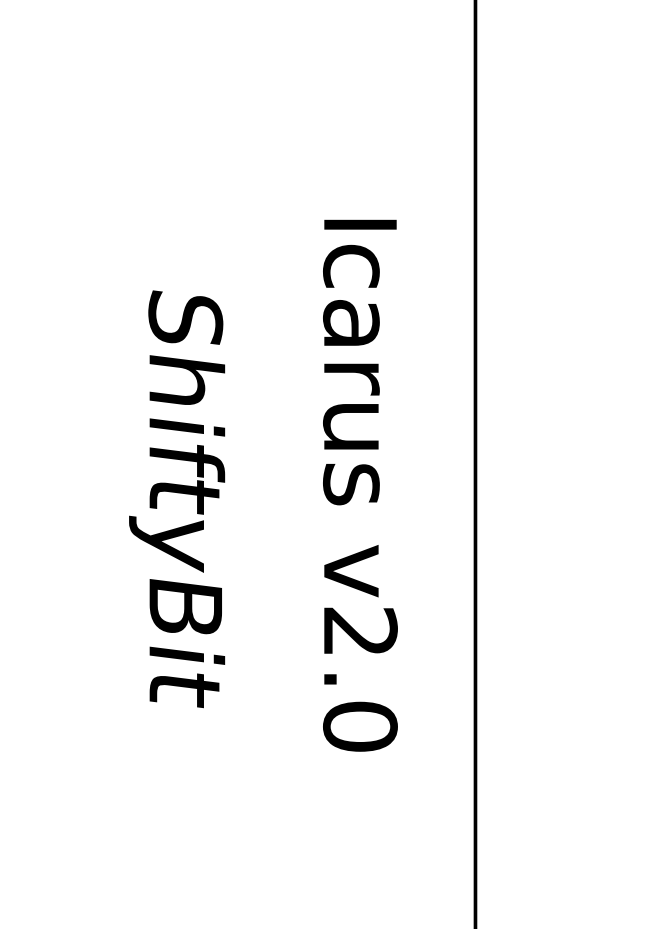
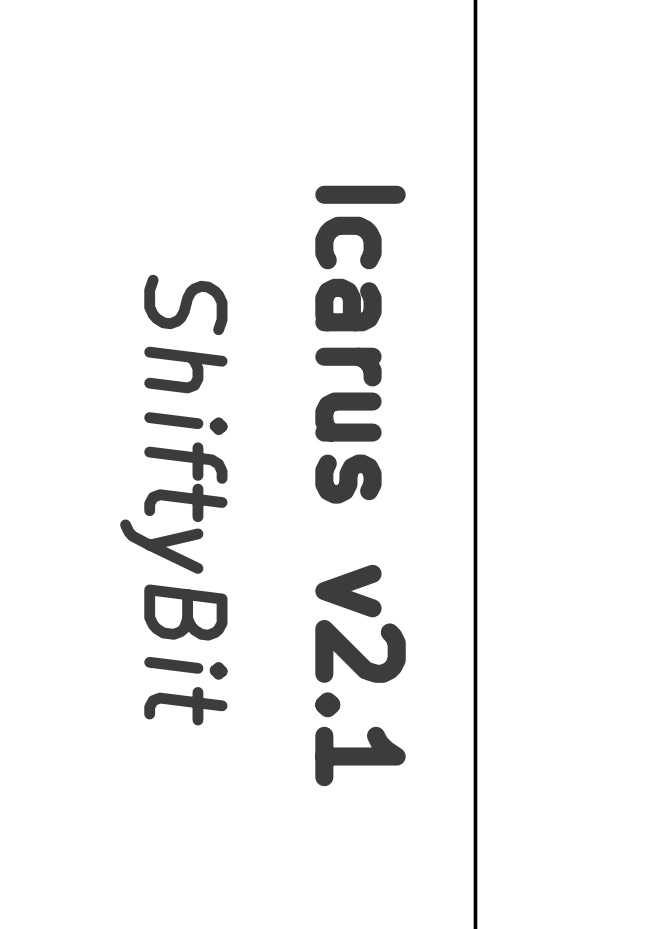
text: Icarus v2.0 (360, 485) -> Icarus v2.1 (360, 485)

